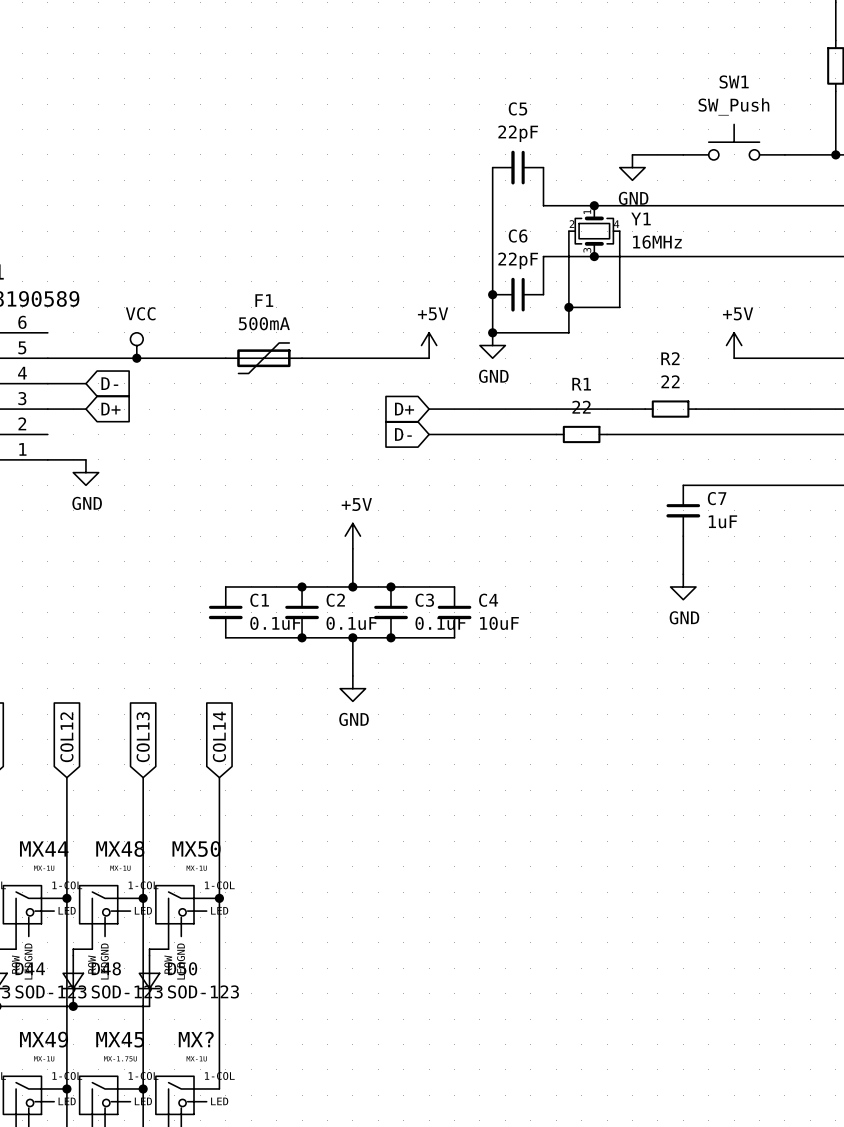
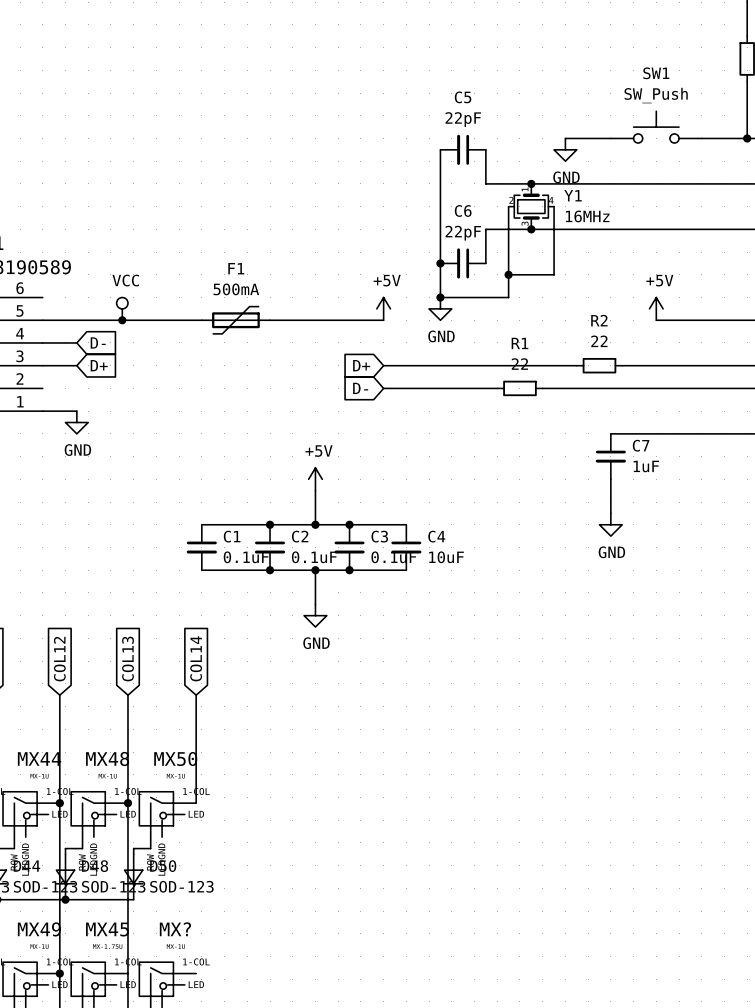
wire: (219, 898) (219, 1088) -> none
junction: (219, 898) -> none
junction: (143, 1088) -> none

